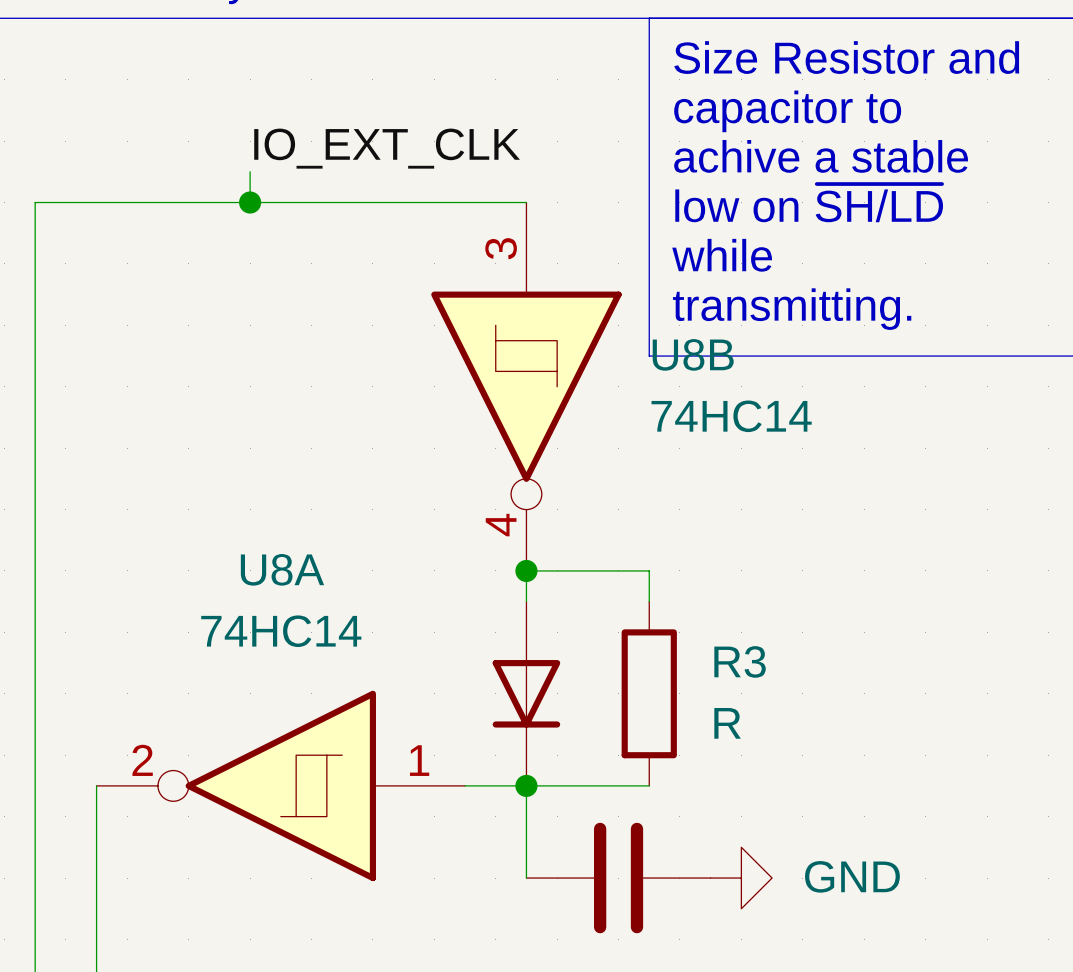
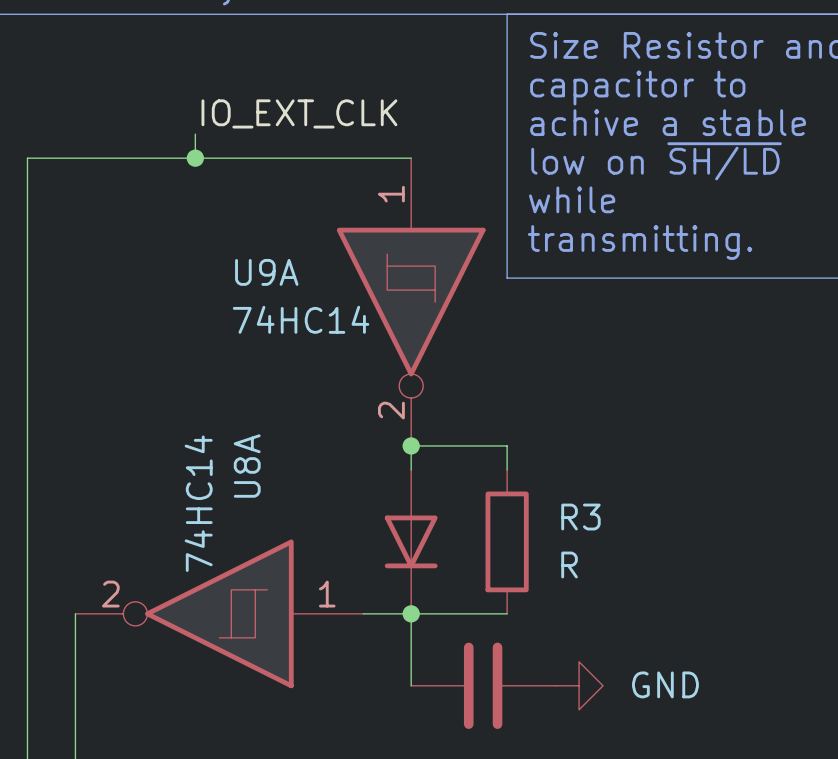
U8B pin number: 3 (501, 248) -> 1 (391, 194)
U8B name: U8B (693, 354) -> U9A (266, 272)
U8B value position: 74HC14 (731, 416) -> 74HC14 (301, 319)
U8B pin number: 4 (501, 525) -> 2 (391, 410)
U8A name rotation: 0° (282, 569) -> 90° counterclockwise (247, 466)
U8A value rotation: 0° (281, 631) -> 90° counterclockwise (198, 503)

